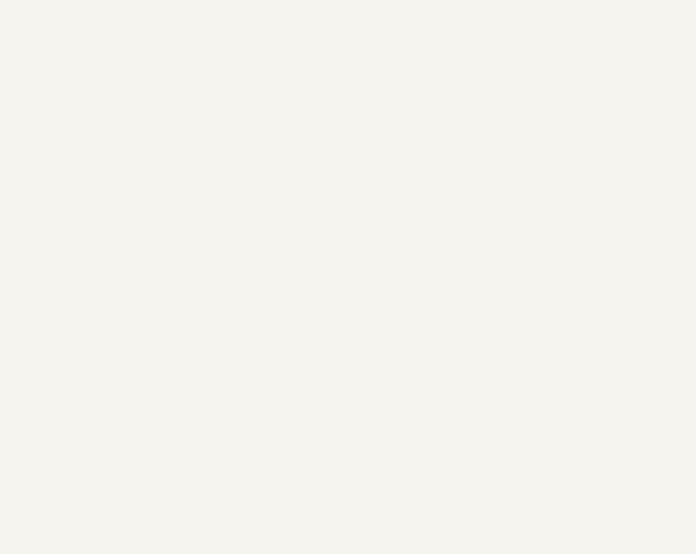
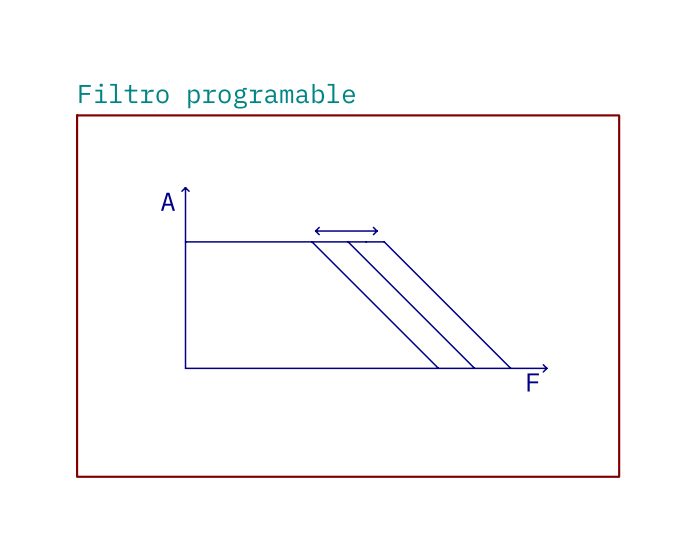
line: none -> (185, 187) (185, 368) (546, 368)
line: none -> (185, 187) (181, 191)
line: none -> (185, 187) (189, 191)
text: none -> A (167, 201)
line: none -> (319, 227) (315, 231)
line: none -> (373, 227) (377, 231)
line: none -> (315, 231) (319, 234)
line: none -> (315, 231) (377, 231)
line: none -> (377, 231) (373, 234)
line: none -> (185, 241) (384, 241) (510, 368)
line: none -> (311, 241) (438, 368)
line: none -> (348, 241) (474, 368)
sheet Filtro programable: none -> (348, 296)
line: none -> (543, 364) (546, 368)
line: none -> (546, 368) (543, 371)
text: none -> F (533, 382)

